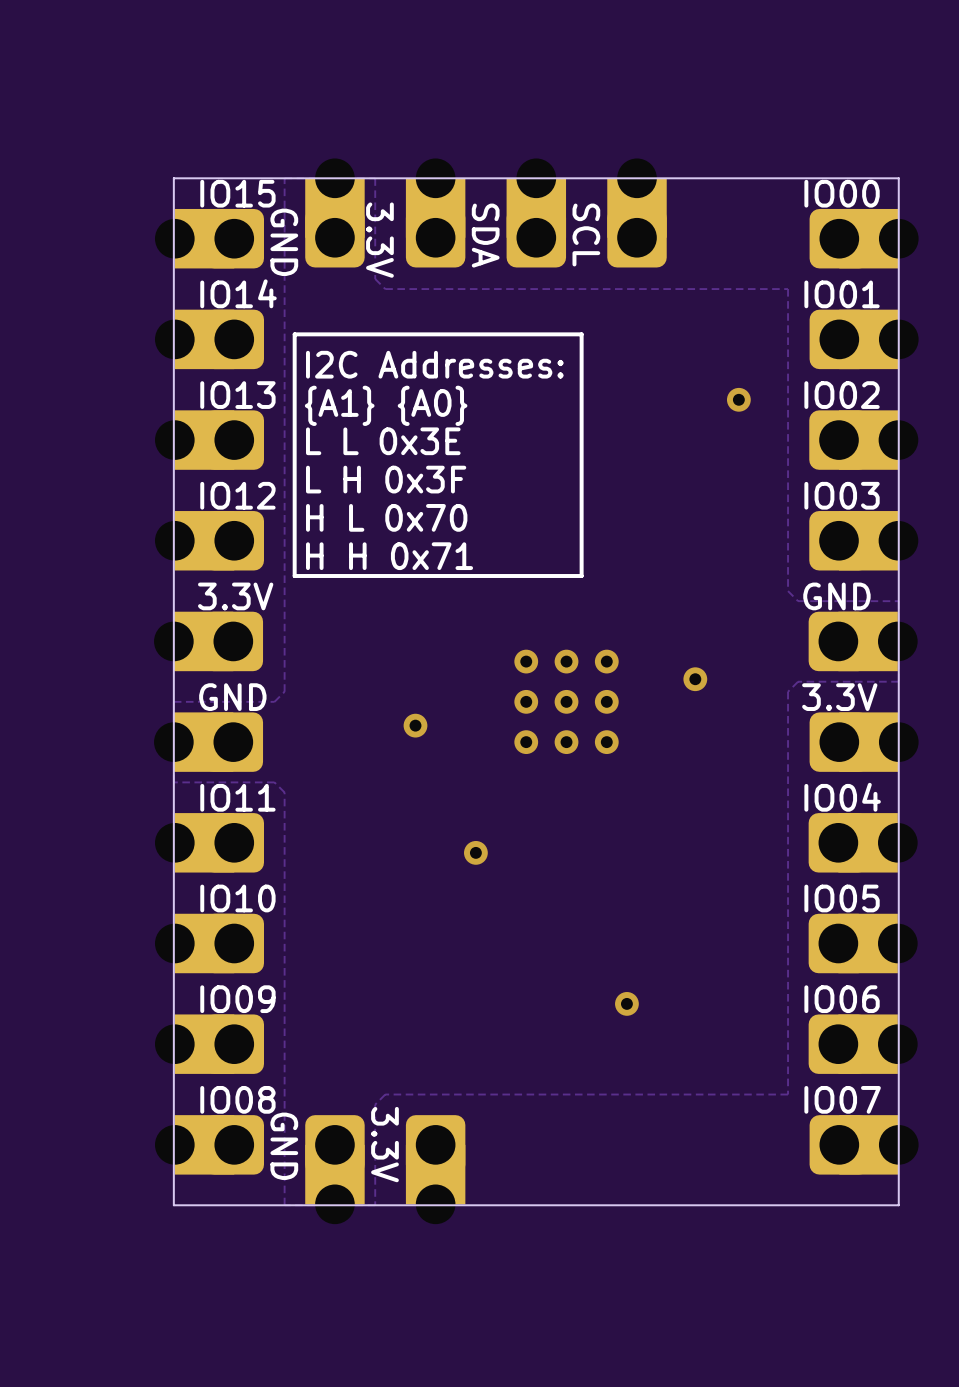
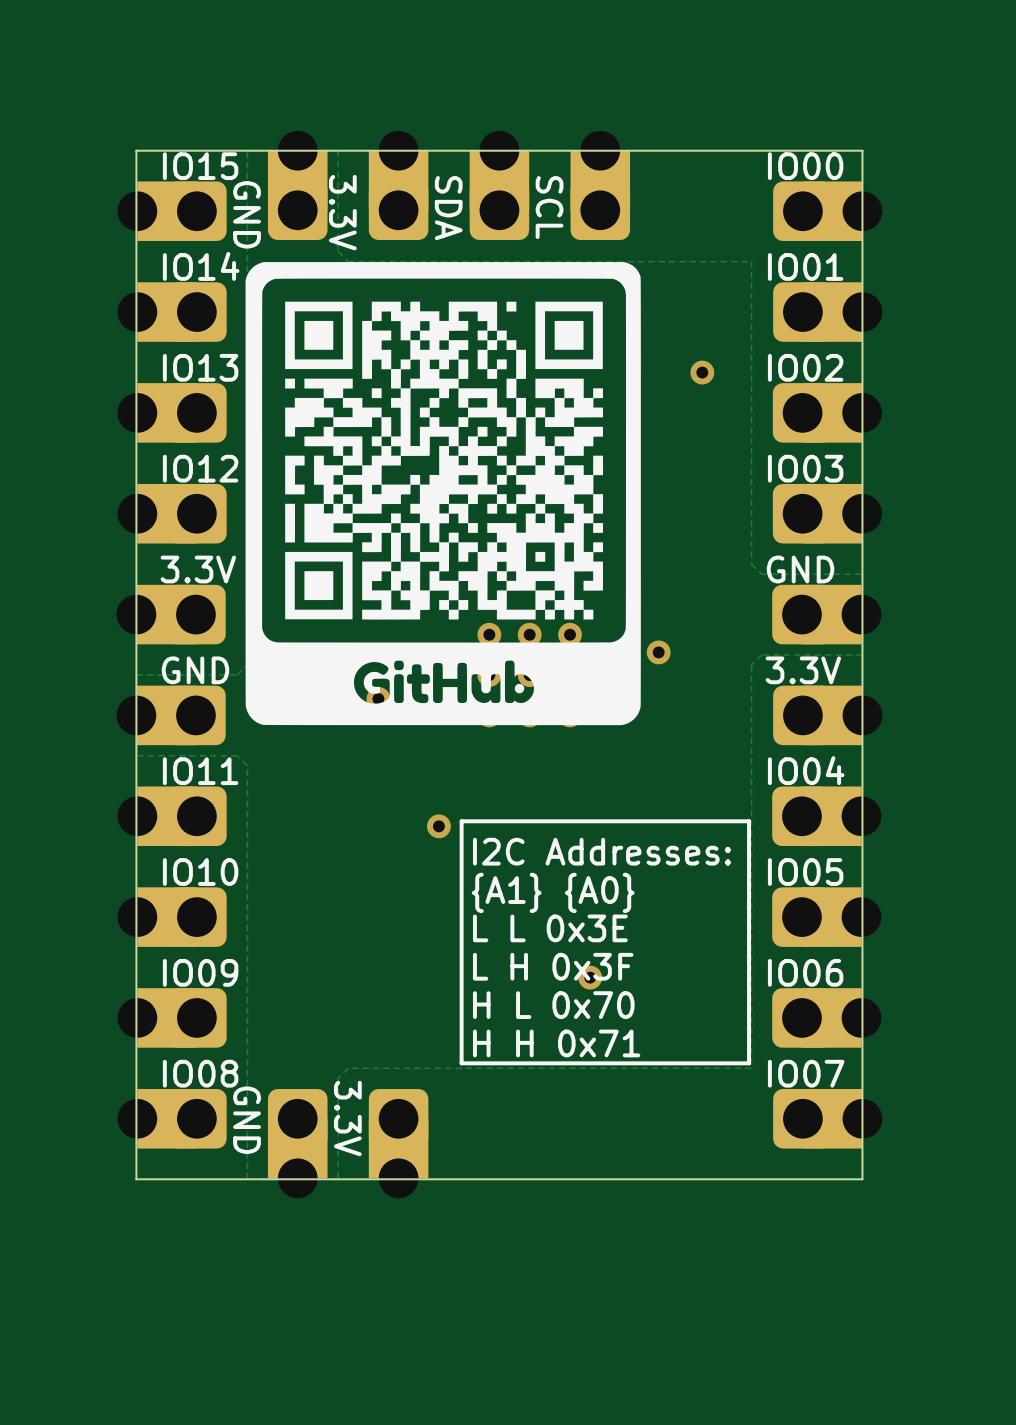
drawing: none -> [245, 262, 641, 726]
line: (581, 334) (294, 334) (294, 576) (581, 576) (581, 334) -> (749, 821) (461, 821) (461, 1063) (749, 1063) (749, 821)
text position: I2C Addresses: (434, 364) -> I2C Addresses: (601, 851)
text position: {A1} {A0} (386, 405) -> {A1} {A0} (553, 892)
text position: L L 0x3E (383, 441) -> L L 0x3E (550, 928)
text position: L H 0x3F (386, 479) -> L H 0x3F (553, 966)
text position: H L 0x70 (386, 517) -> H L 0x70 (553, 1005)
text position: H H 0x71 (389, 556) -> H H 0x71 (556, 1043)

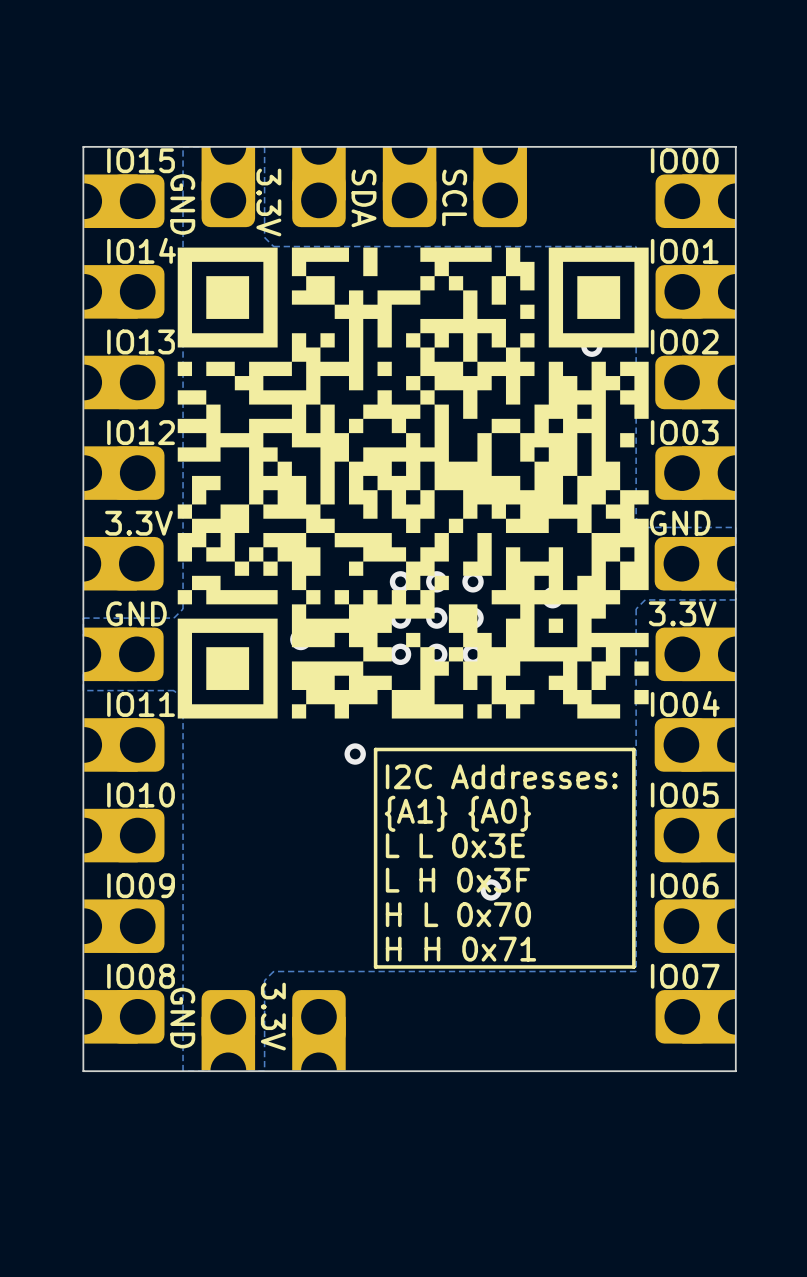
drawing: none -> [177, 247, 649, 719]
drawing: [245, 262, 641, 726] -> none

